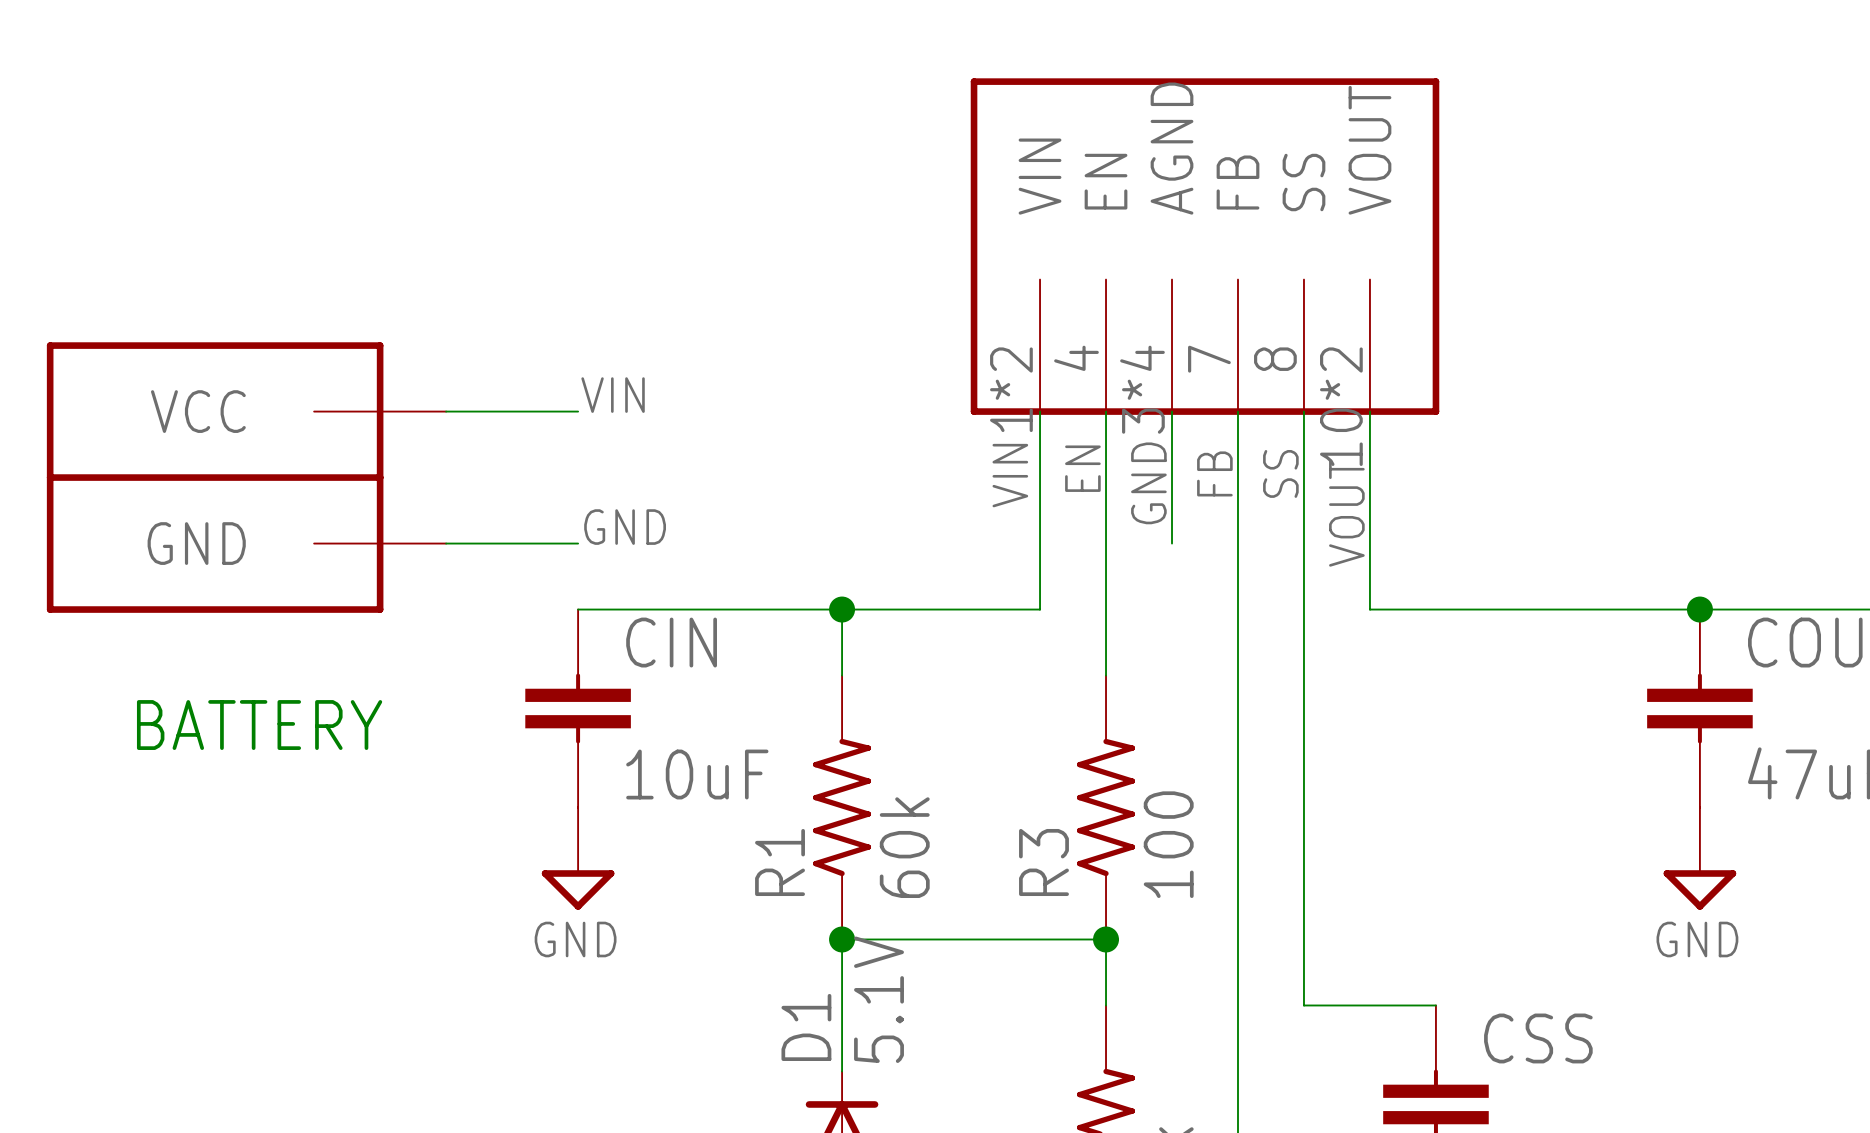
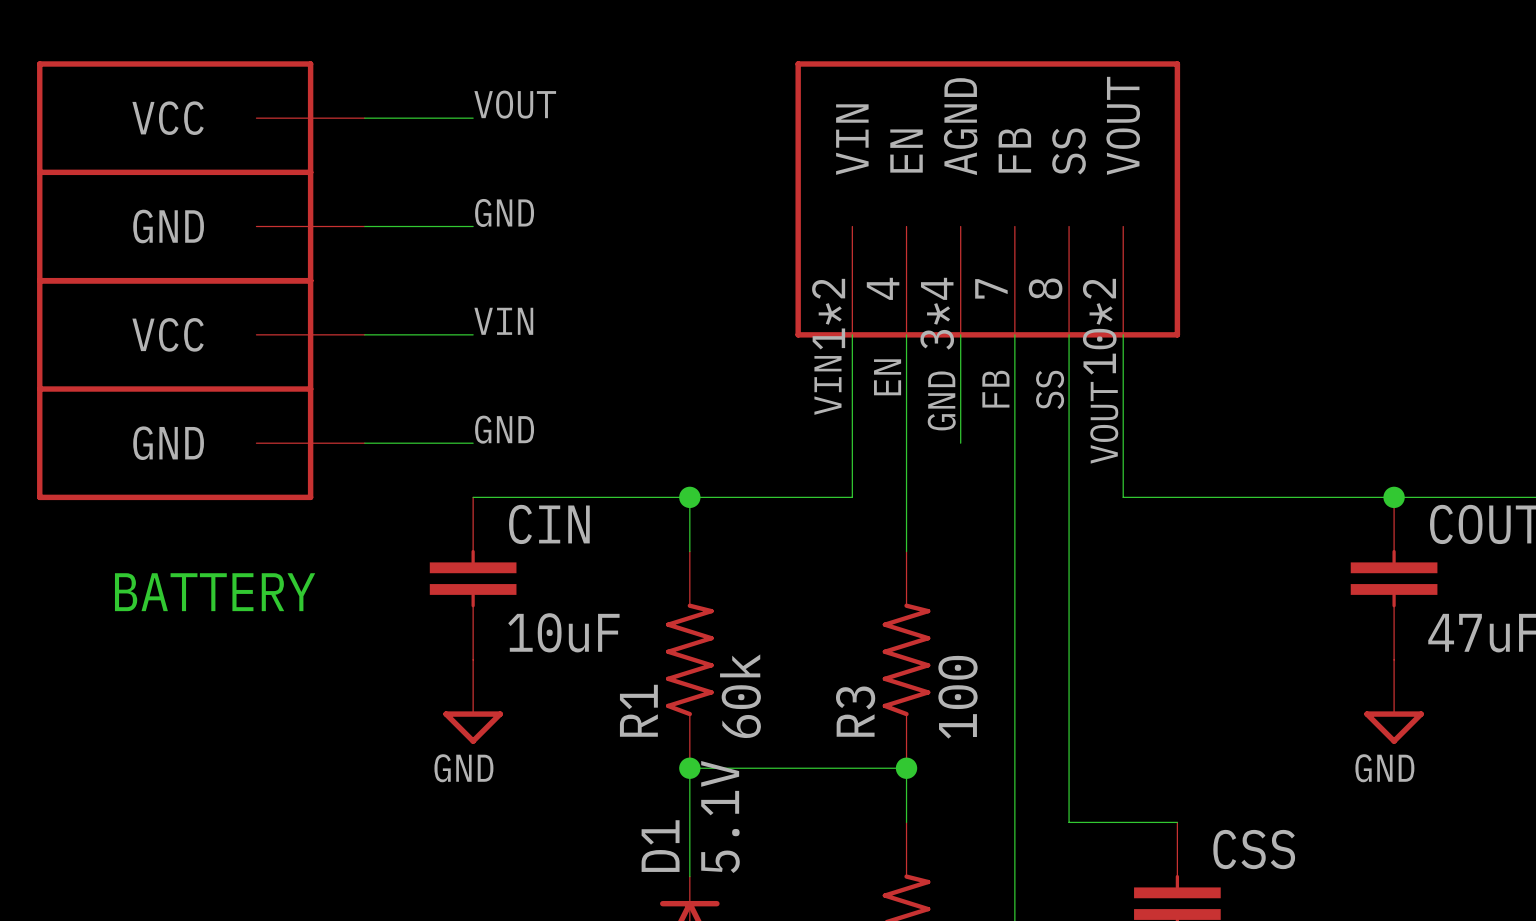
label: none -> VOUT (515, 104)
wire: none -> (364, 118) (473, 118)
part: none -> (200, 172)
label: none -> GND (504, 212)
wire: none -> (364, 226) (473, 226)

